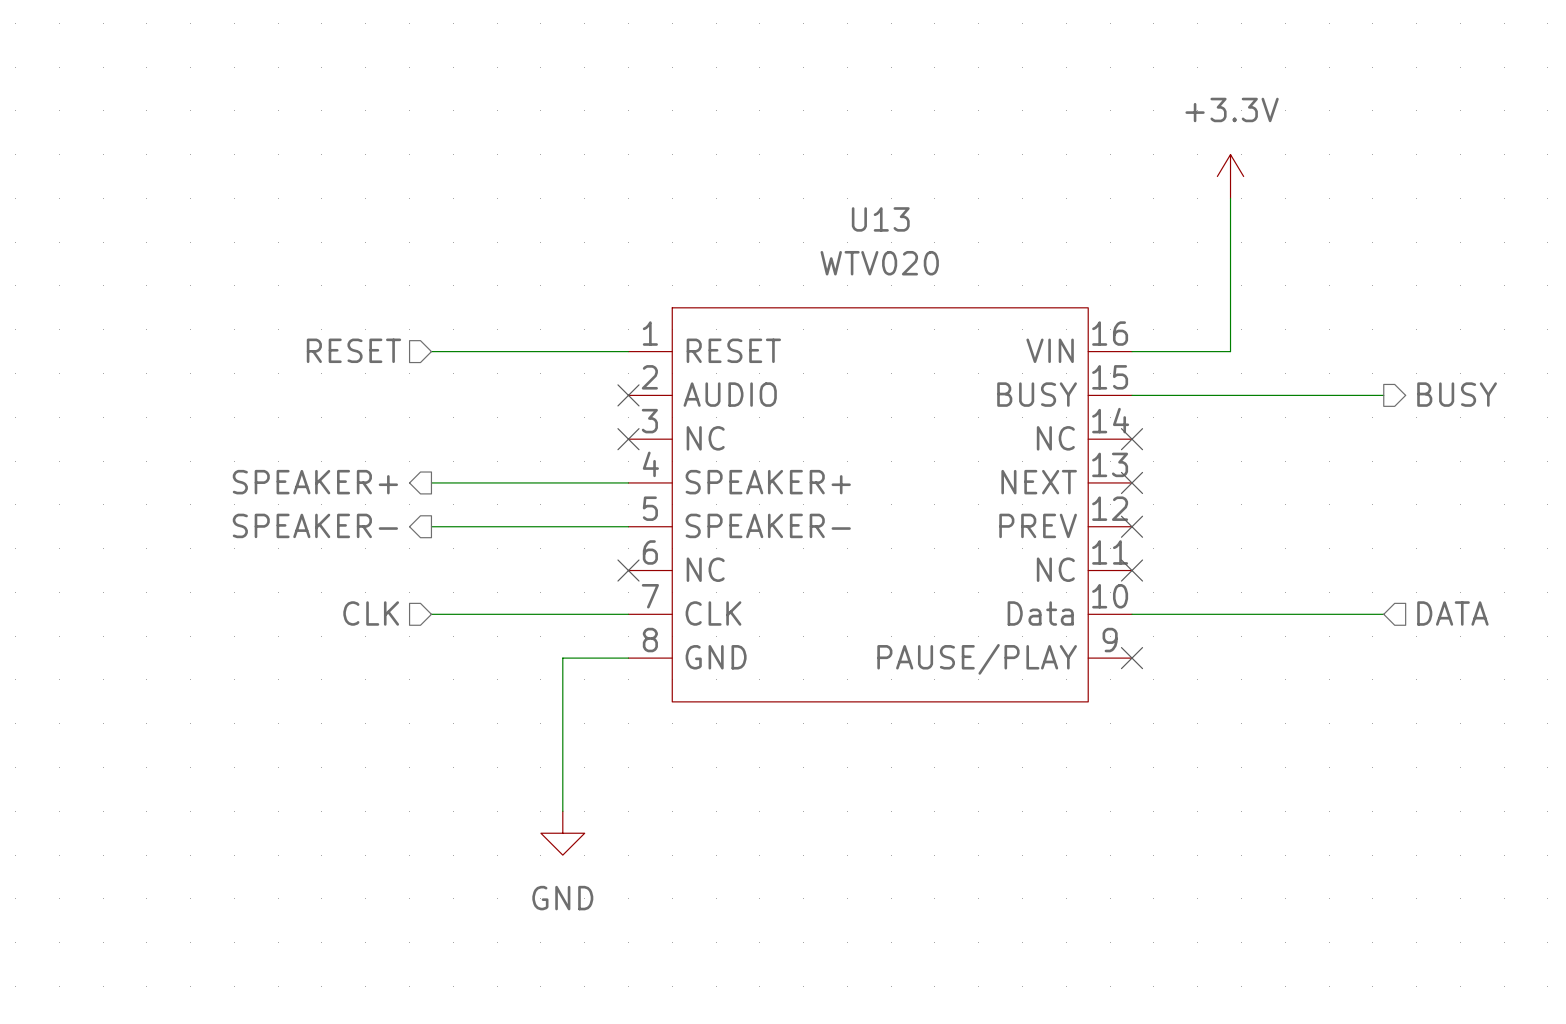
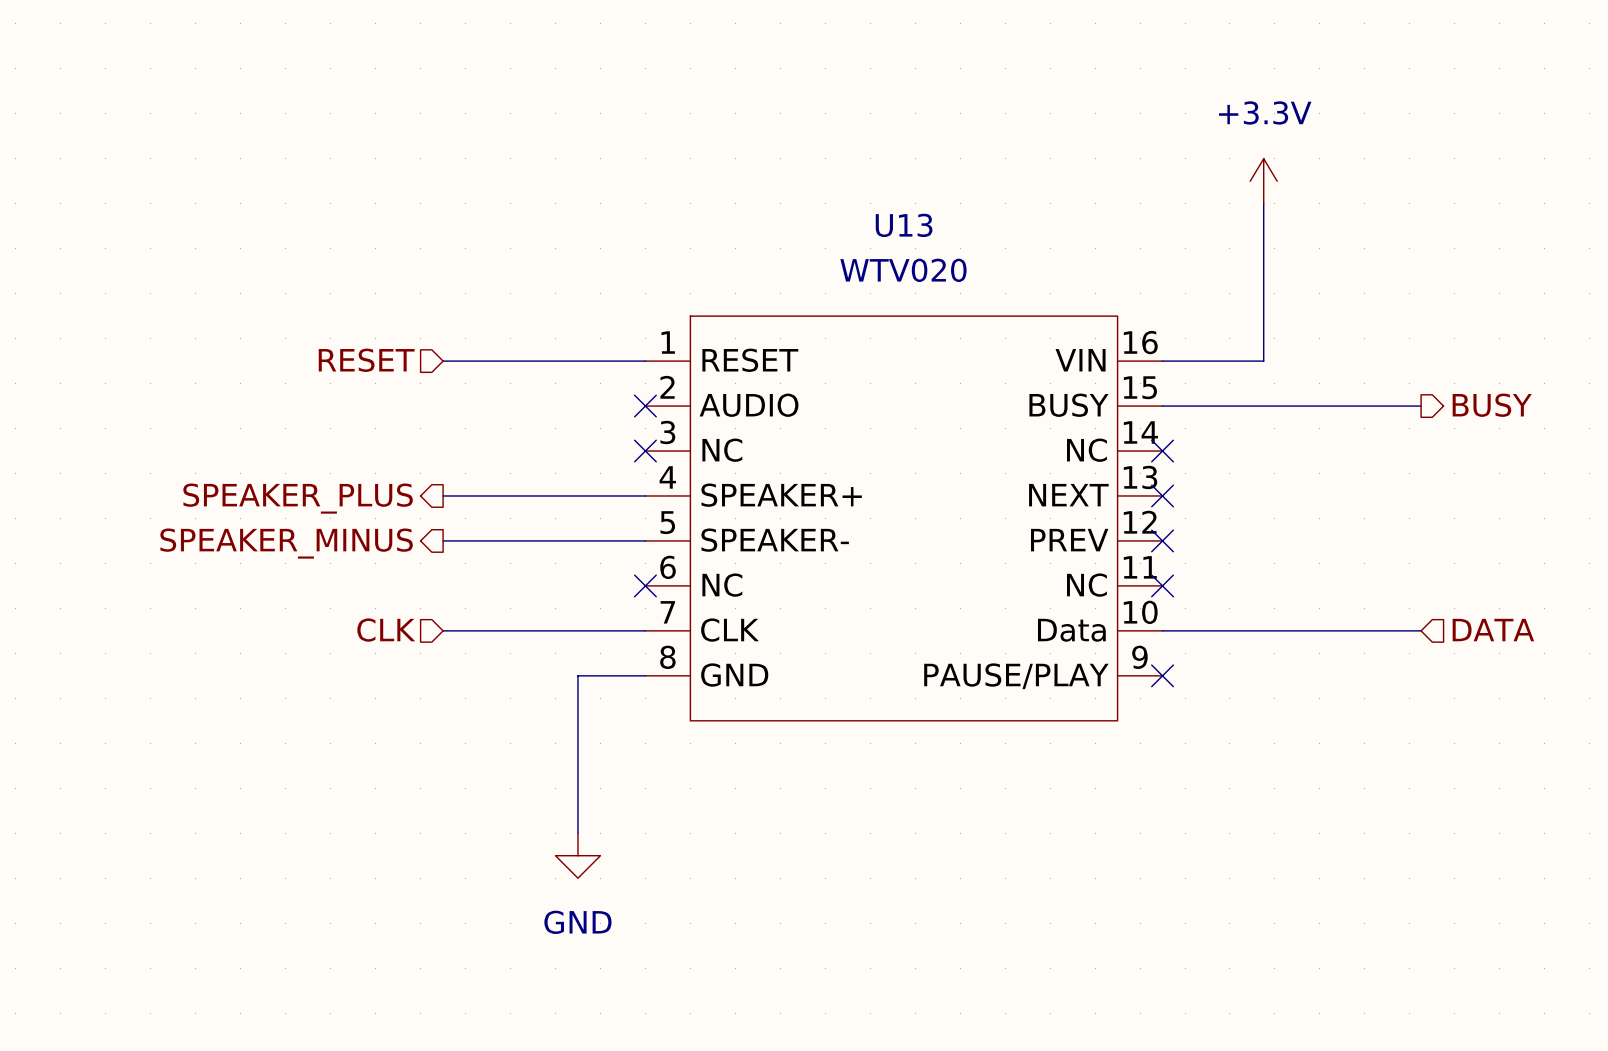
hierarchical label: SPEAKER+ (315, 482) -> SPEAKER_PLUS (298, 498)
hierarchical label: SPEAKER- (315, 525) -> SPEAKER_MINUS (286, 543)

